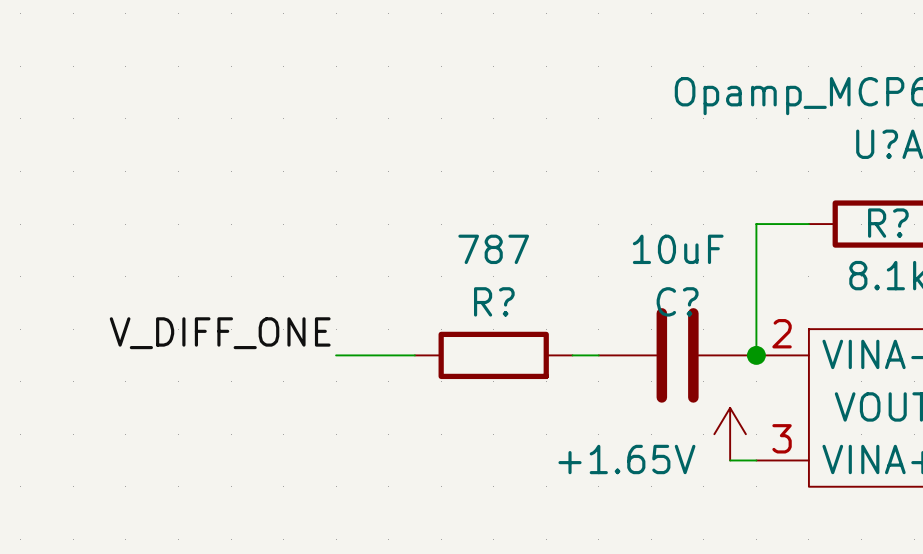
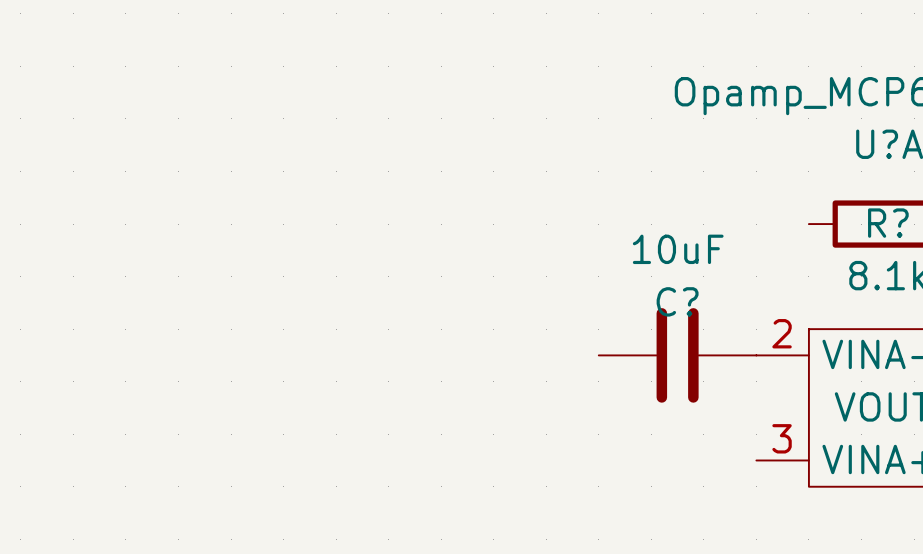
wire: (808, 224) (756, 224) (756, 355) -> none
label: V_DIFF_ONE (220, 333) -> none
wire: (336, 355) (414, 355) -> none
R?: 787 (493, 355) -> none
wire: (572, 355) (598, 355) -> none
junction: (756, 355) -> none
power symbol: +1.65V (730, 434) -> none
wire: (730, 460) (756, 460) -> none

